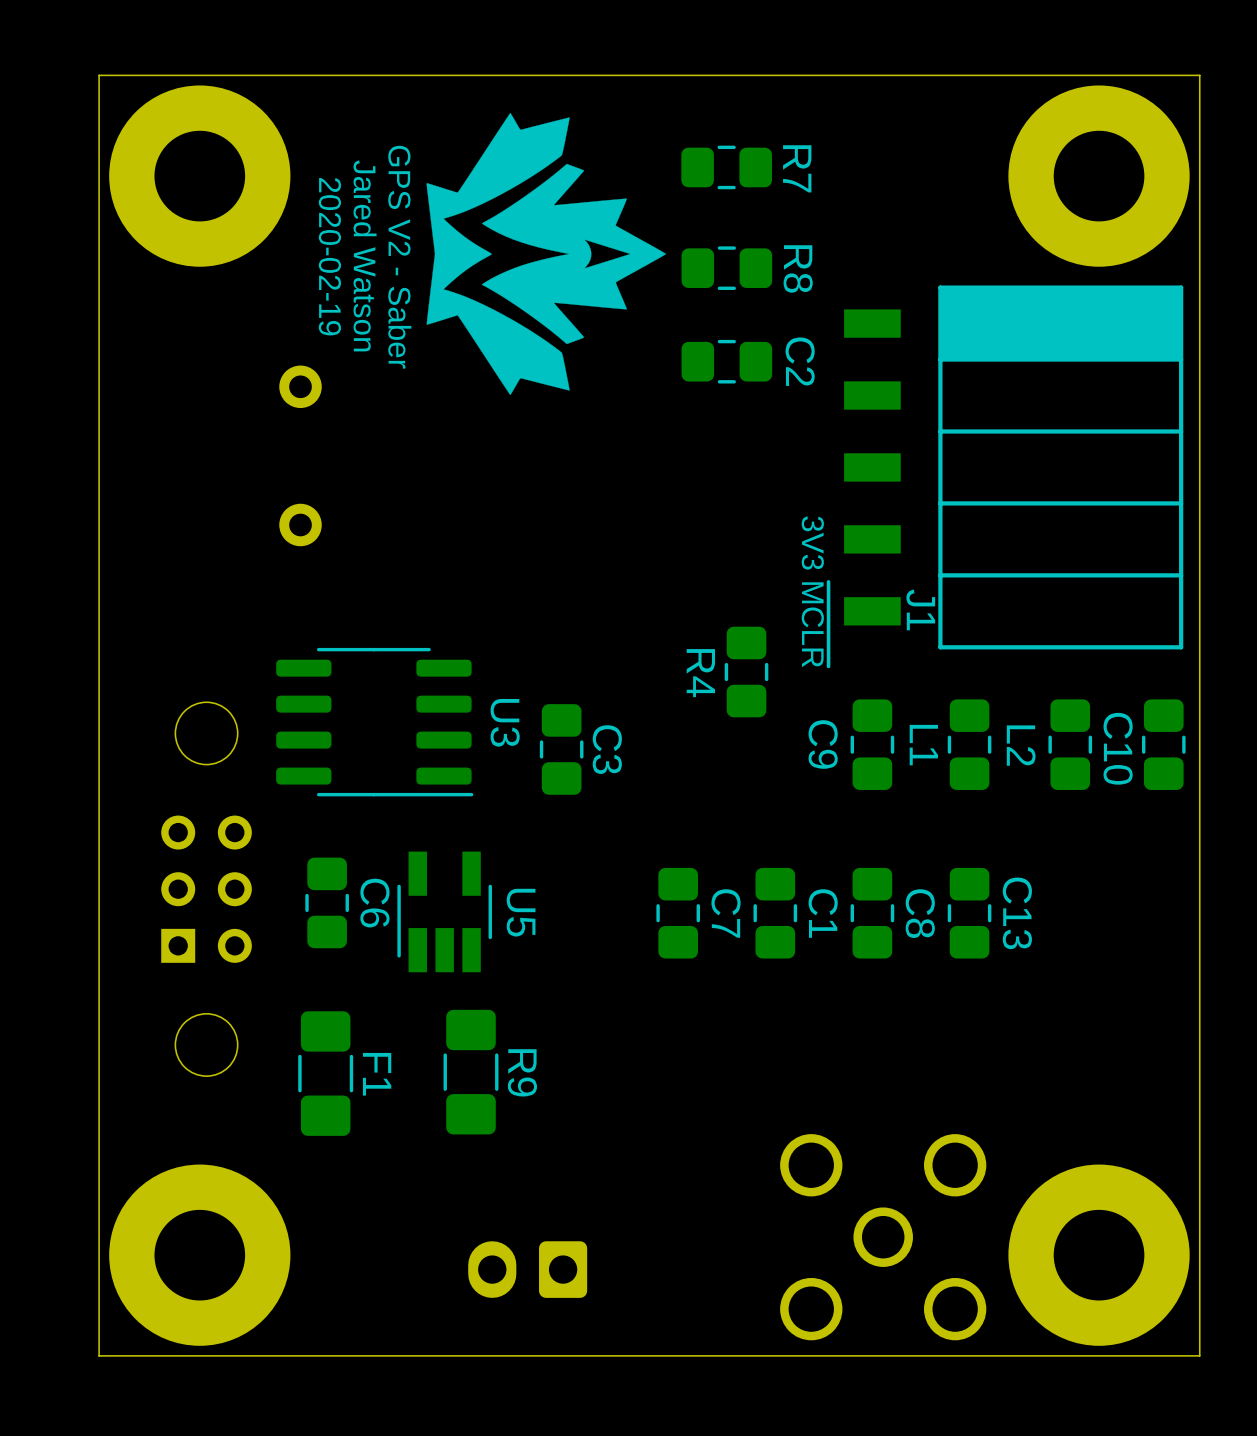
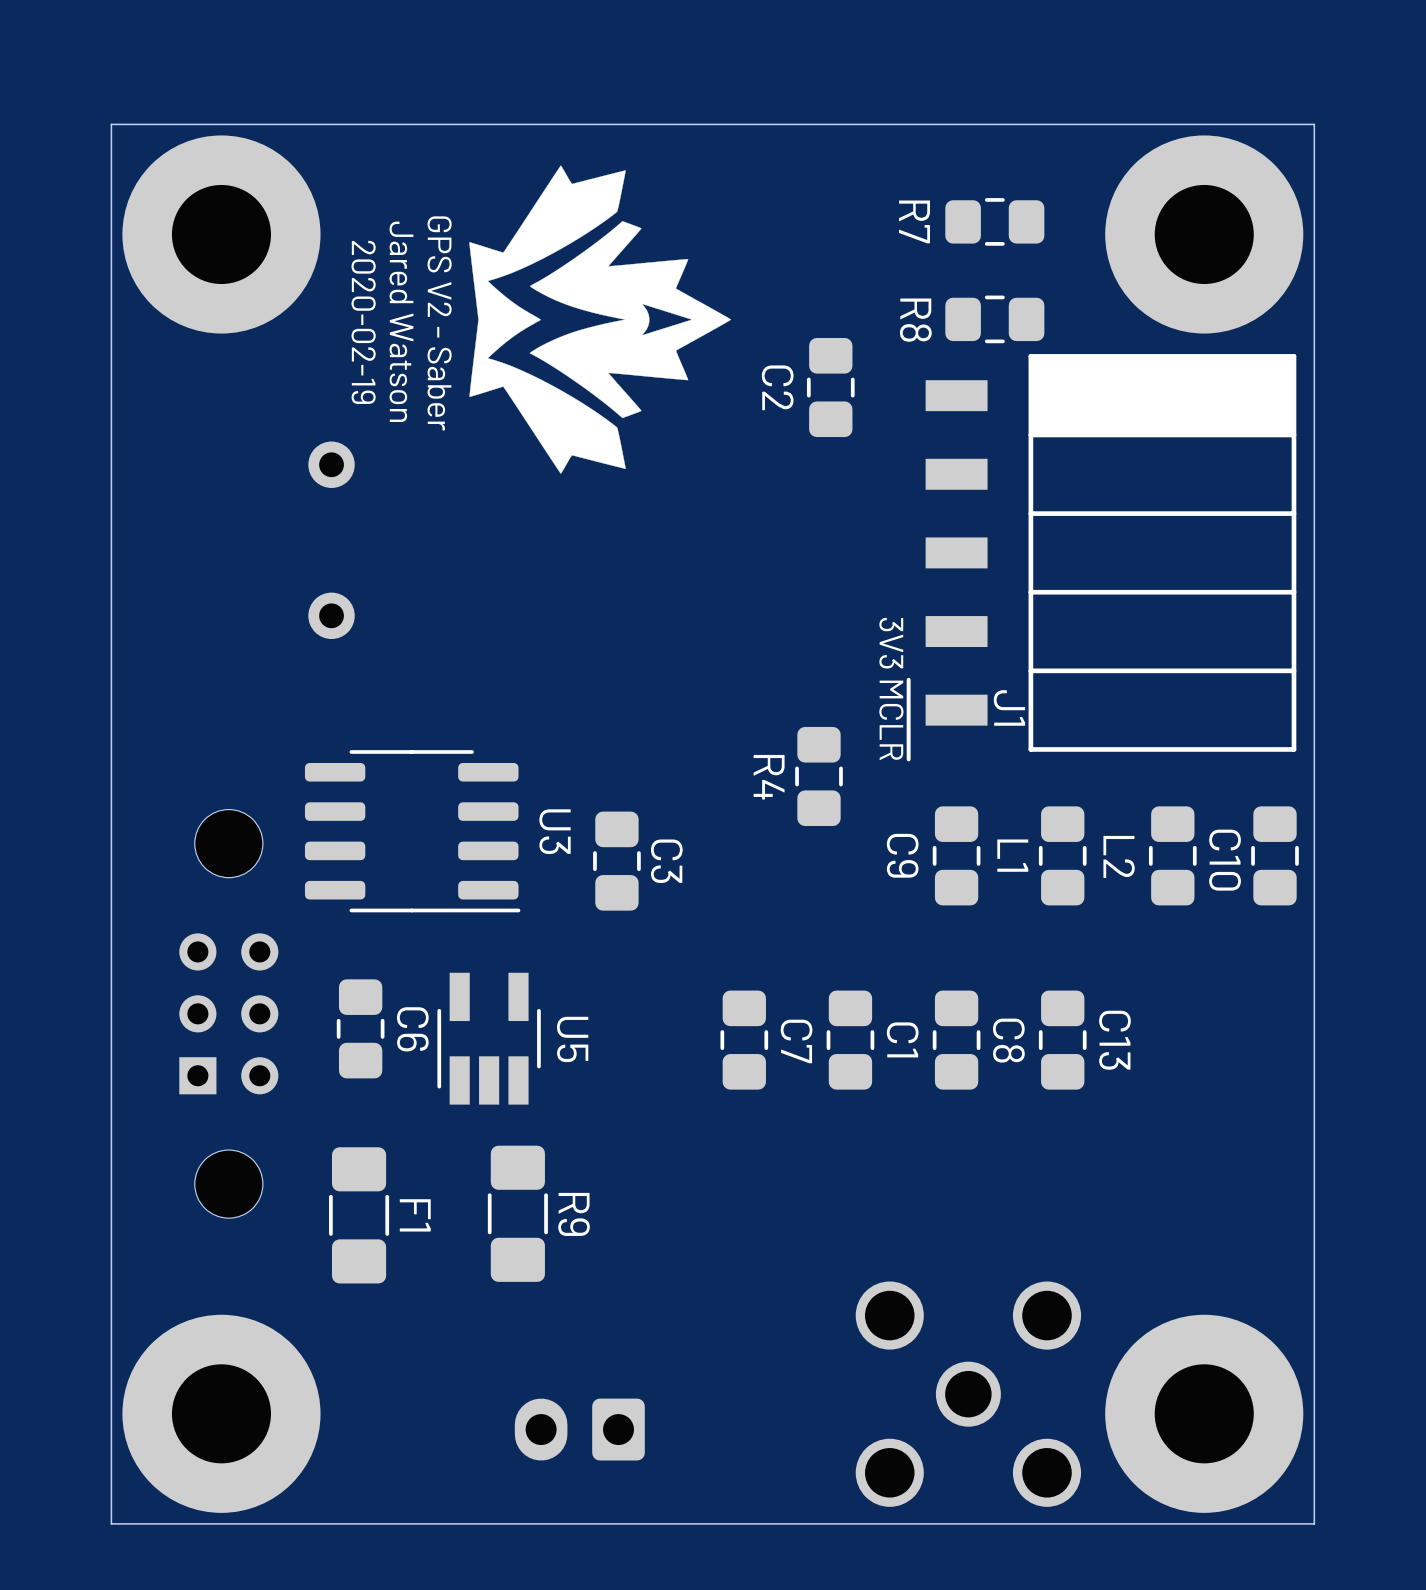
R7 position: (726, 167) -> (994, 221)
R7 name position: R7 (797, 168) -> R7 (914, 221)
R8 position: (726, 268) -> (994, 319)
R8 name position: R8 (798, 268) -> R8 (915, 320)
C2 rotation: 0° (726, 361) -> 90° clockwise (830, 387)
C2 position: (726, 361) -> (830, 387)
C2 name position: C2 (800, 361) -> C2 (777, 387)

